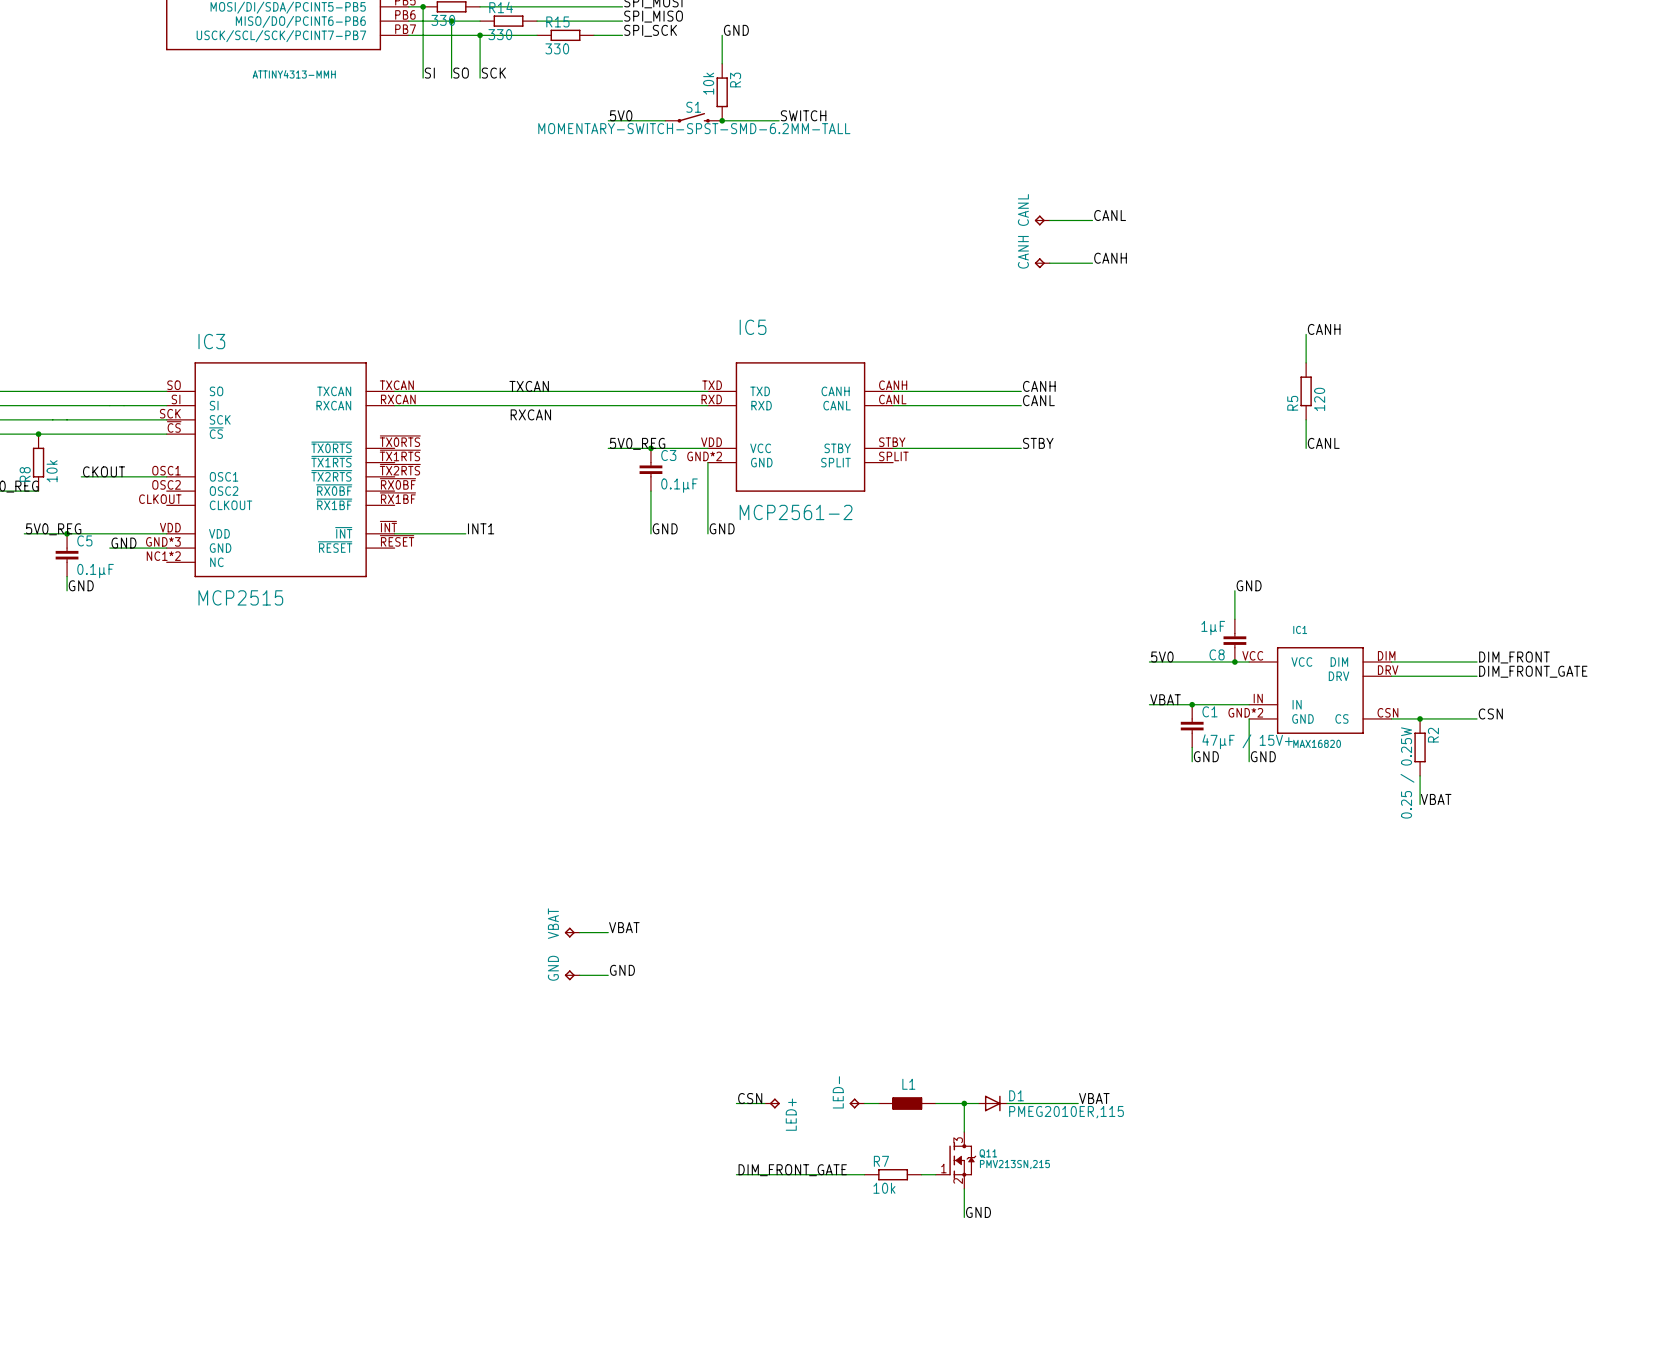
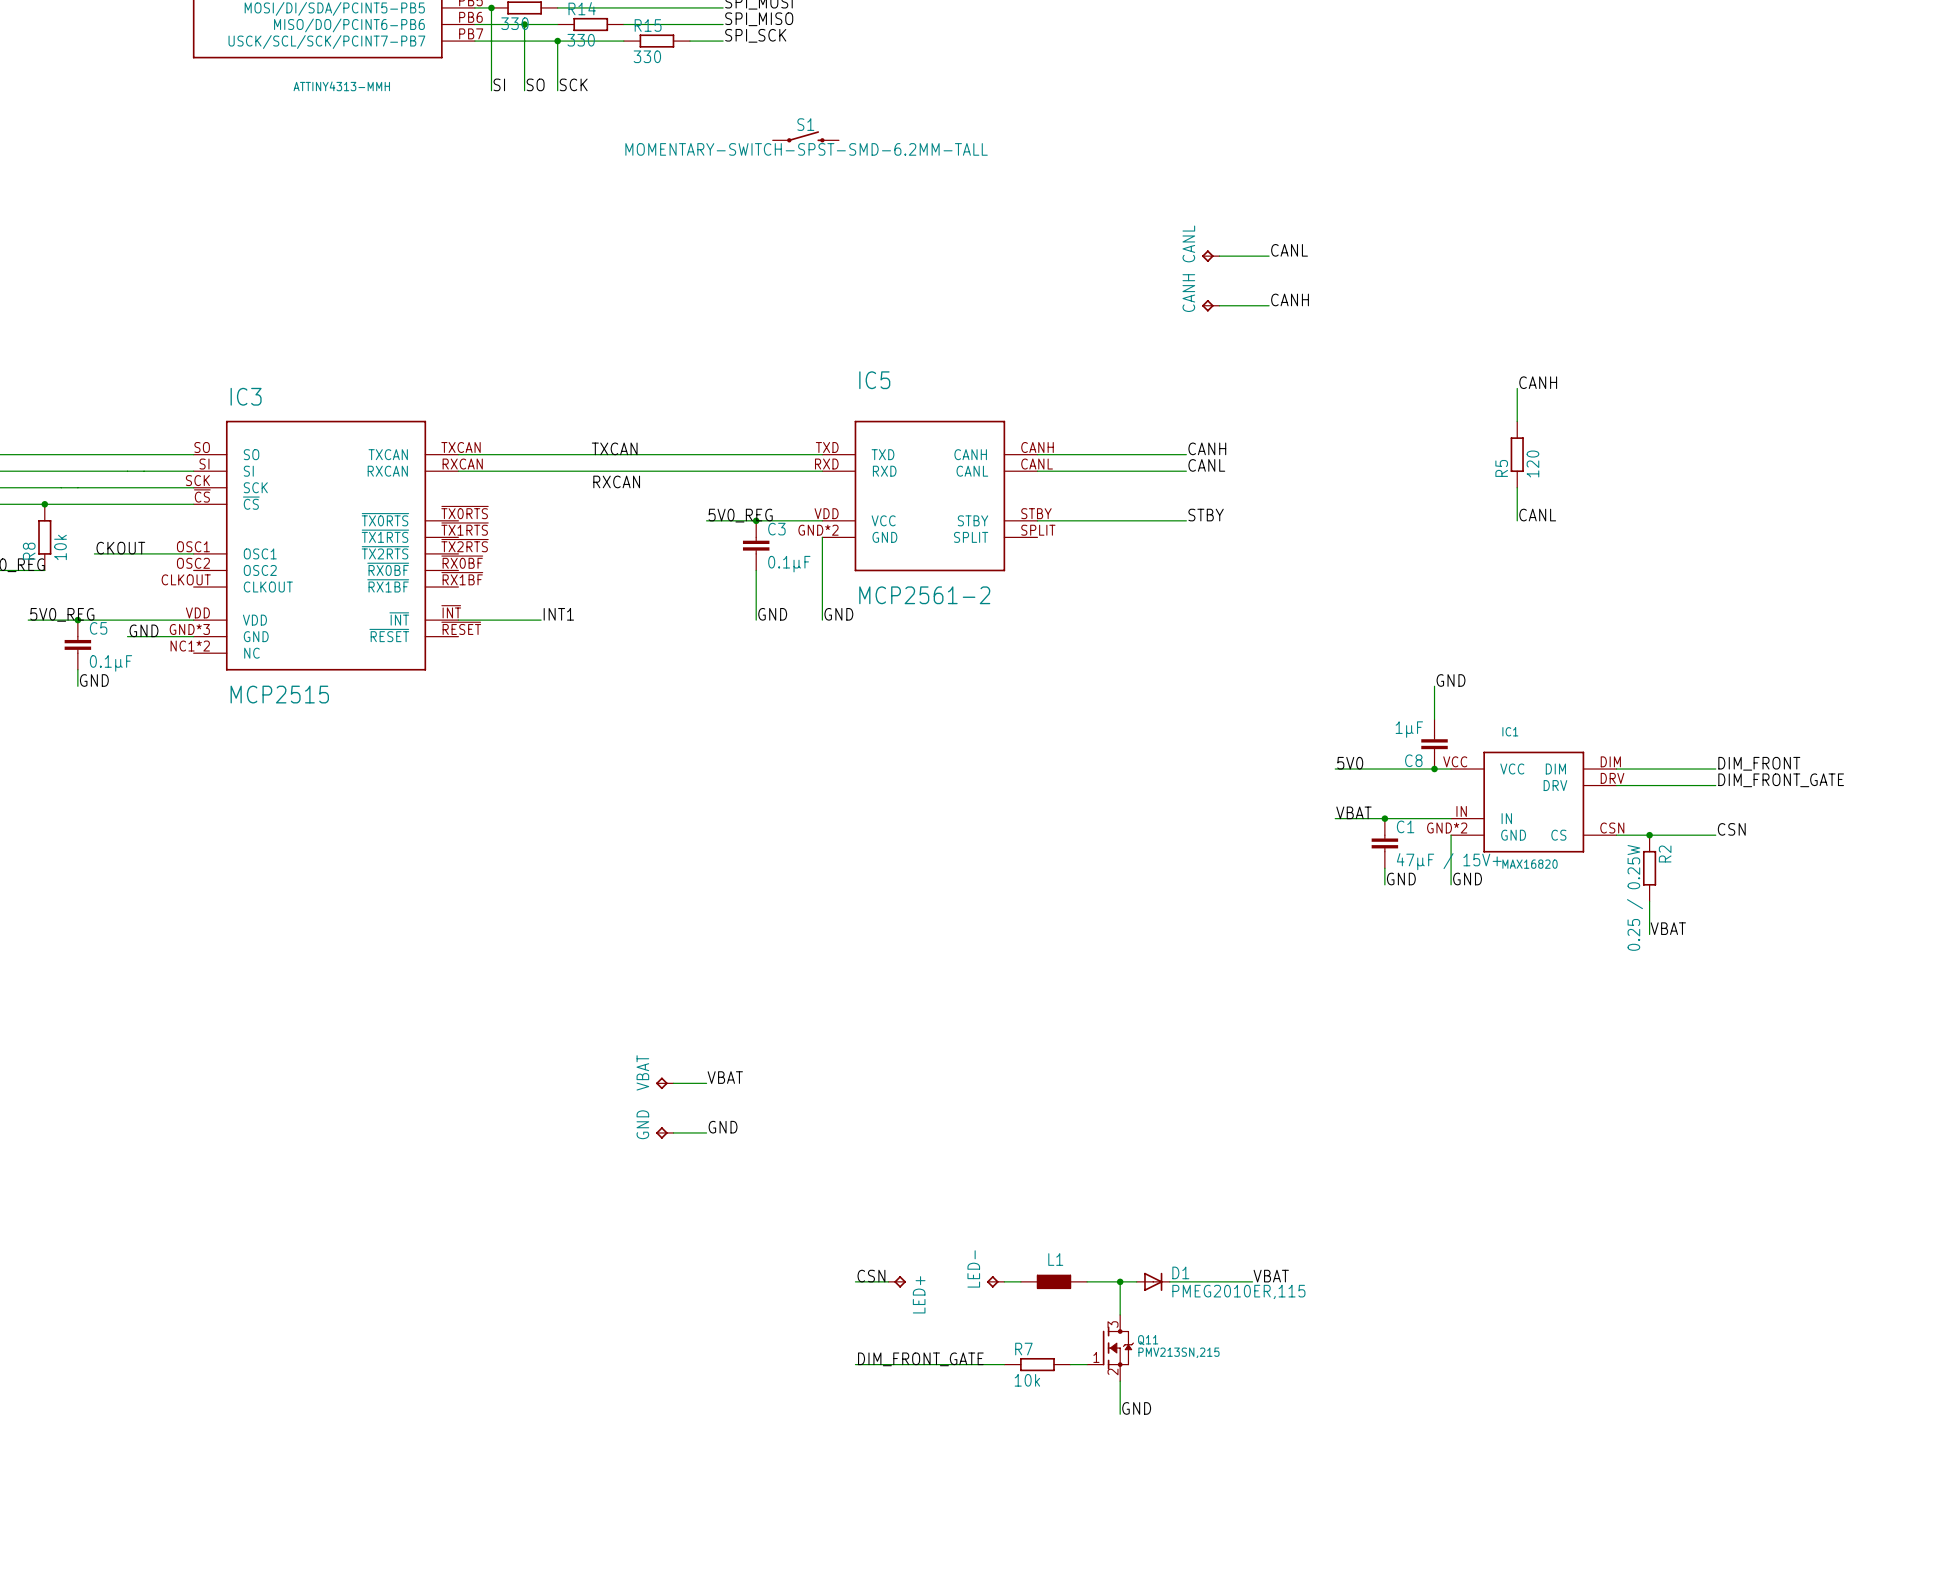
label: GND (736, 30) -> none
wire: (722, 35) (722, 63) -> none
R3: 10k (722, 92) -> none
label: 5V0 (621, 115) -> none
label: SWITCH (803, 115) -> none
wire: (608, 120) (665, 120) -> none
wire: (722, 120) (779, 120) -> none
junction: (722, 120) -> none

